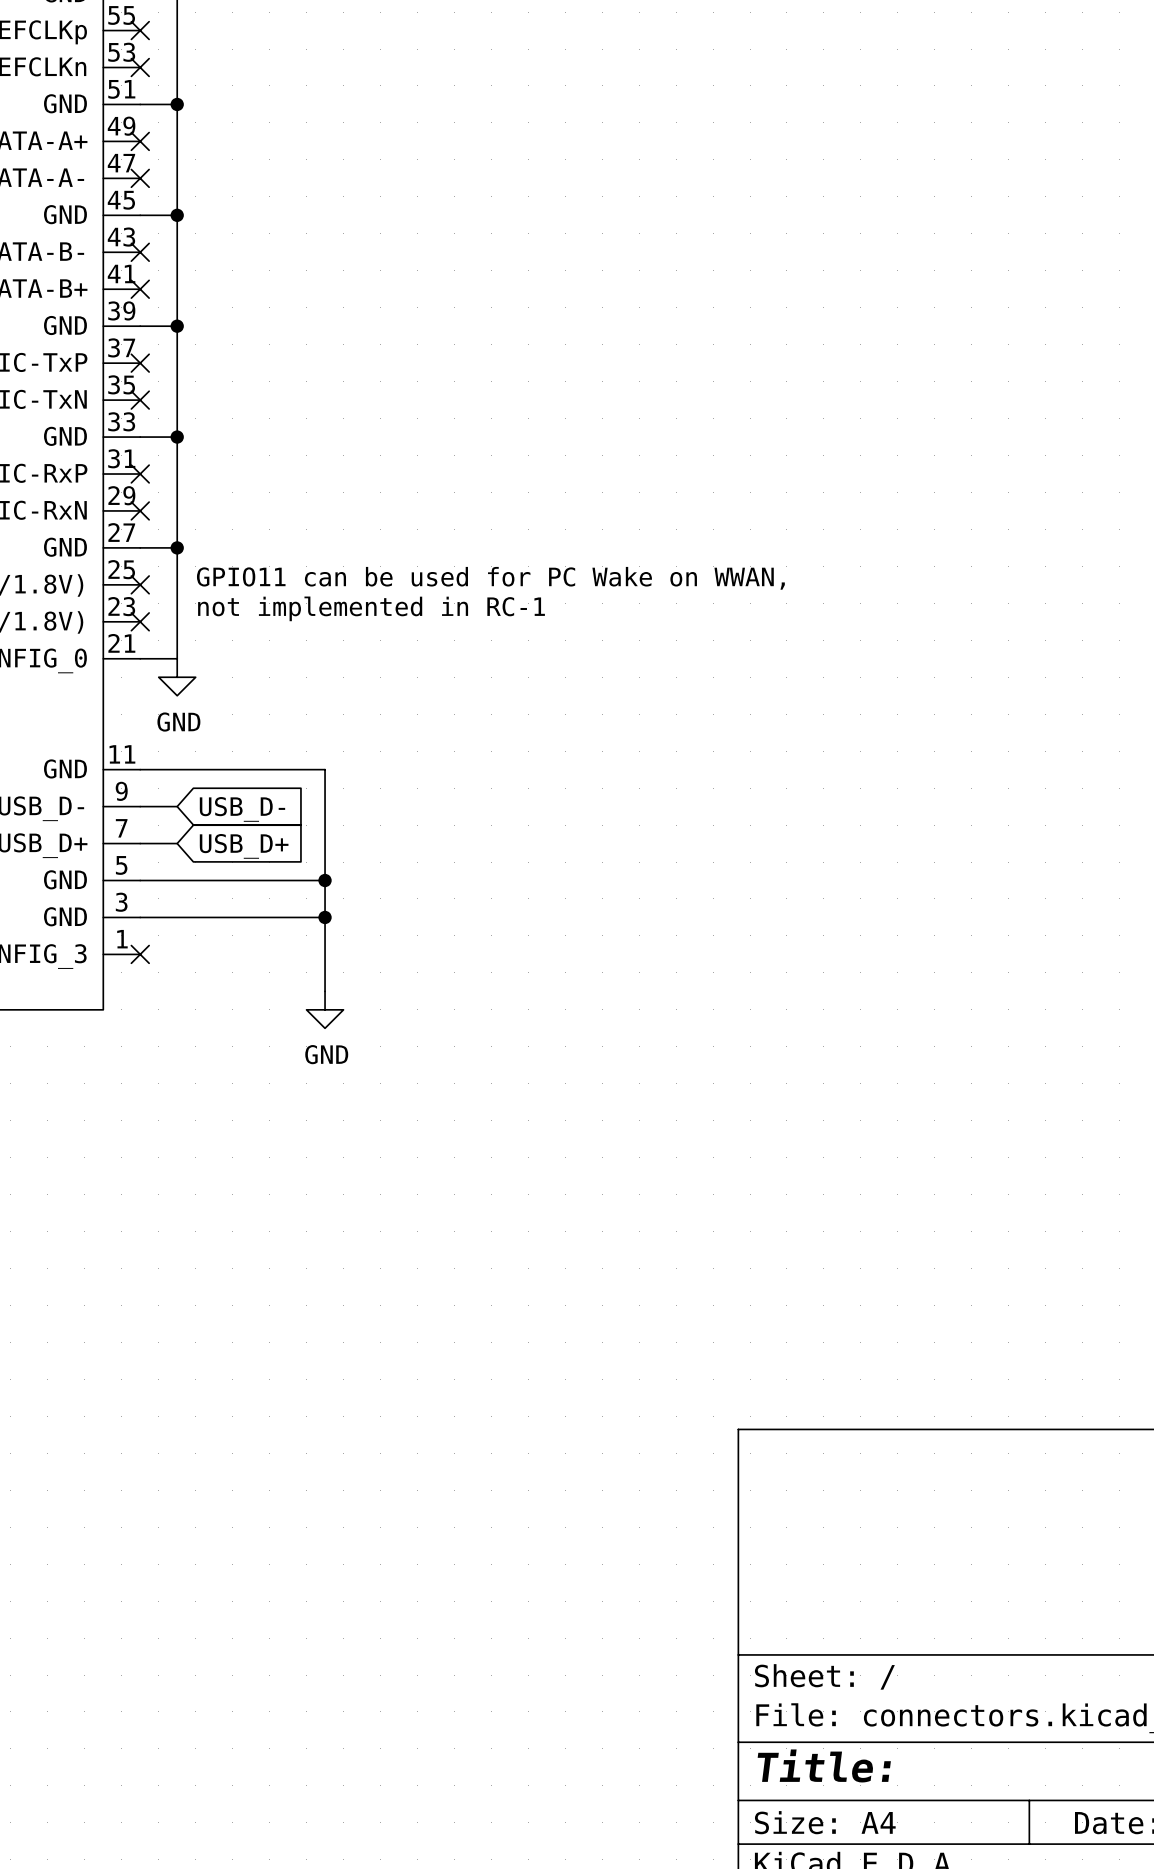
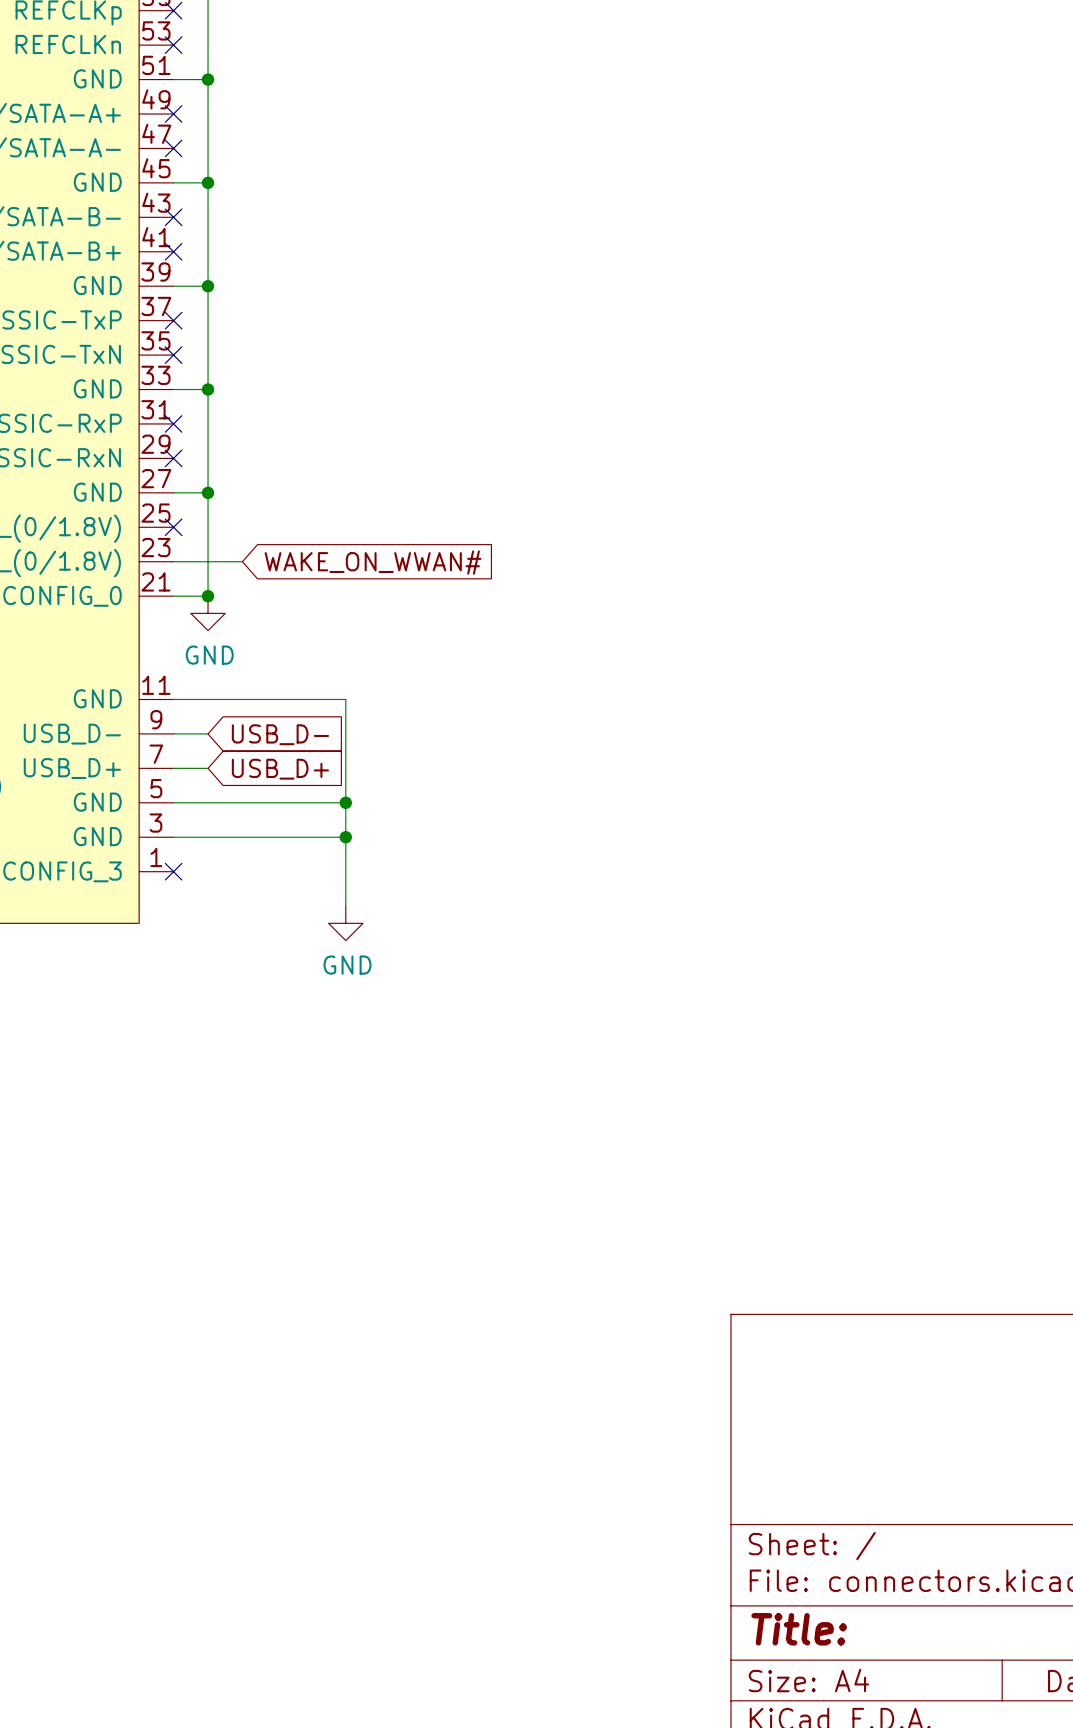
text: GPIO11 can be used for PC Wake on WWAN, (490, 578) -> none
text: not implemented in RC-1 (371, 608) -> none
wire: none -> (173, 561) (242, 561)
no-connect mark: (140, 621) -> none
global label: none -> WAKE_ON_WWAN# (373, 562)
junction: none -> (208, 596)

